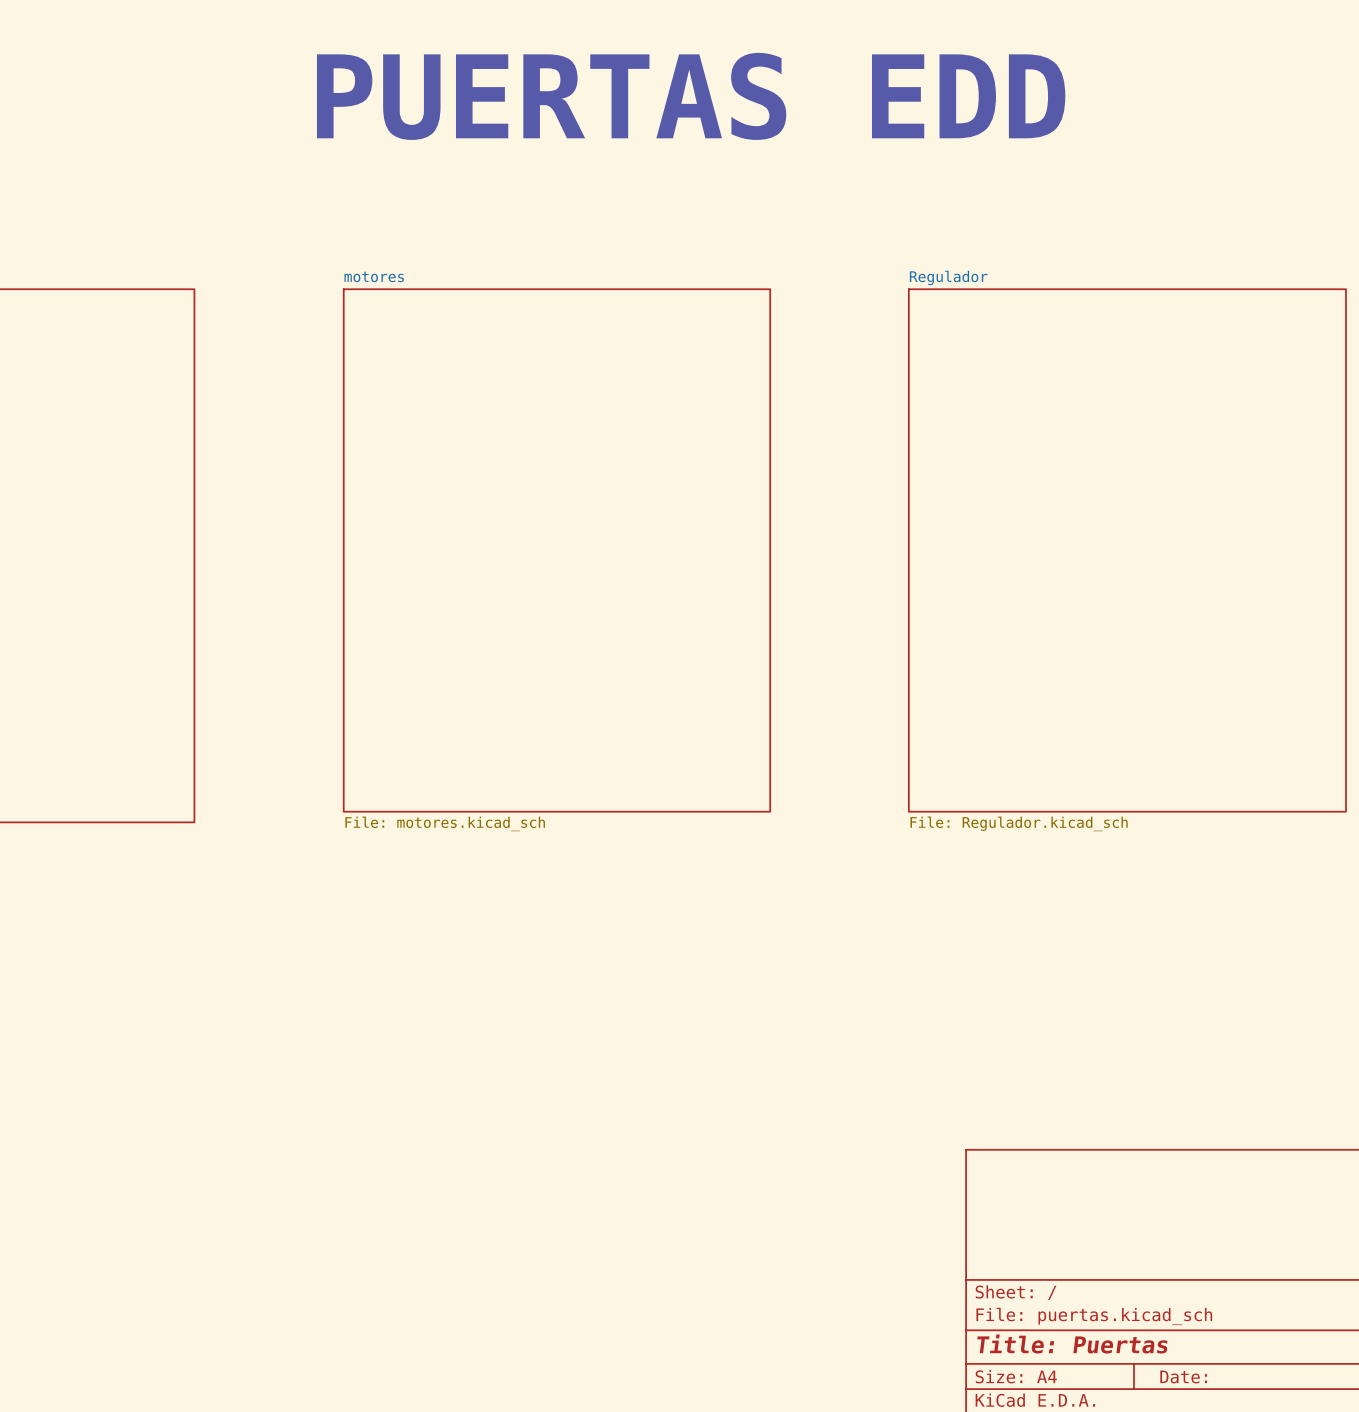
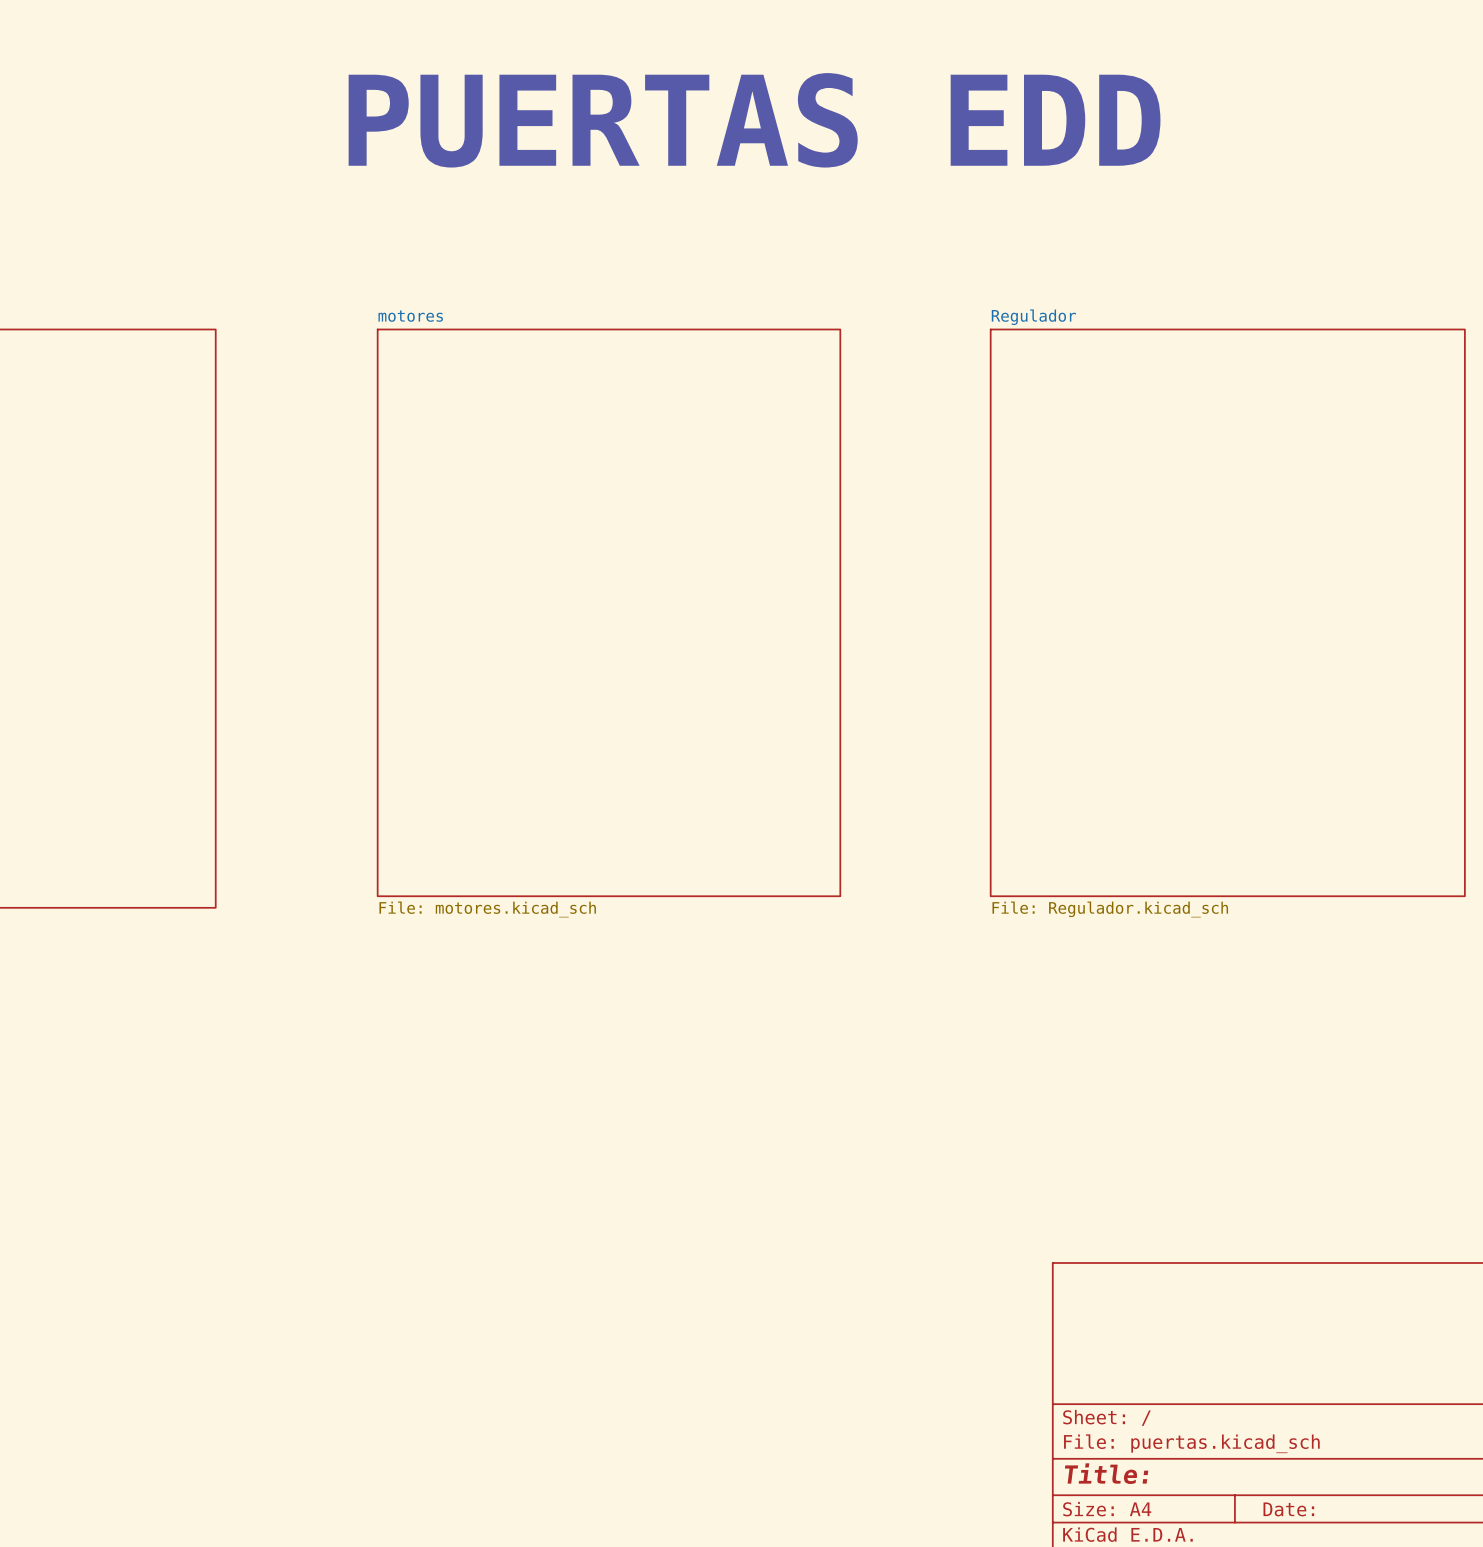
title block: Title: Puertas (1072, 1343) -> Title: (1106, 1473)

